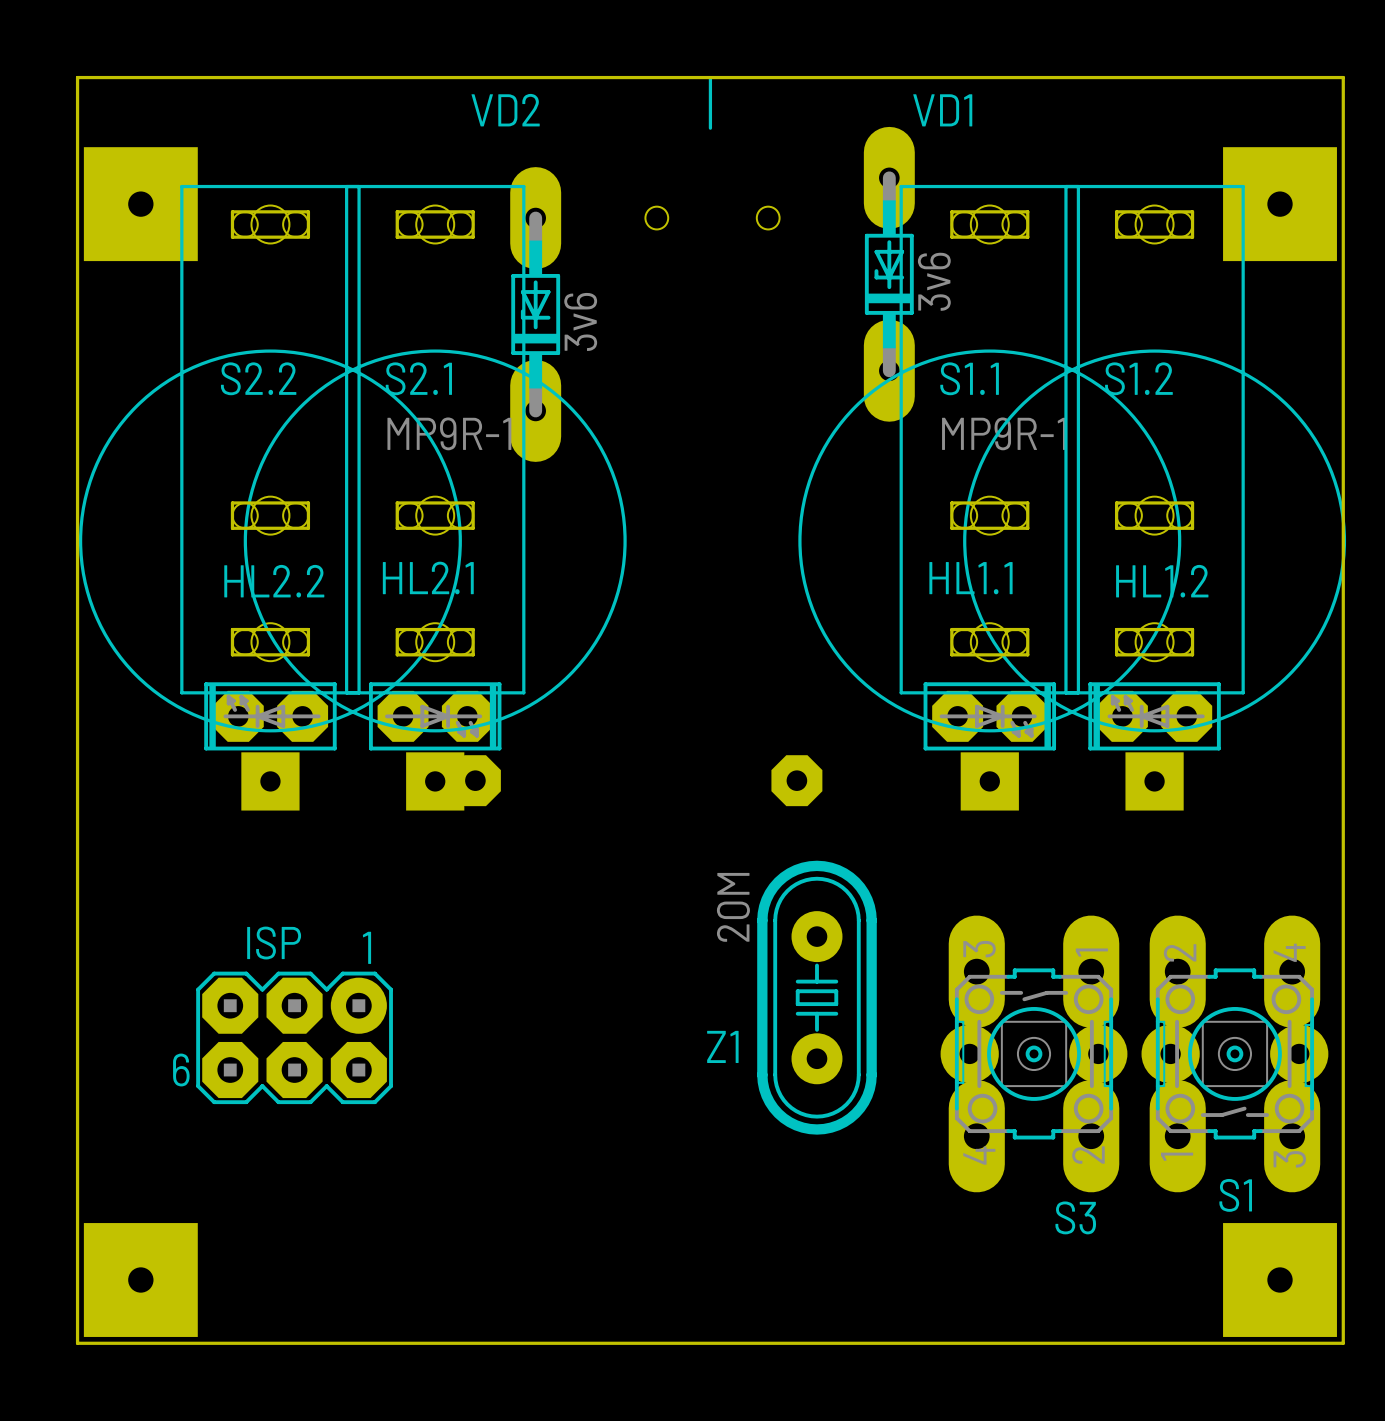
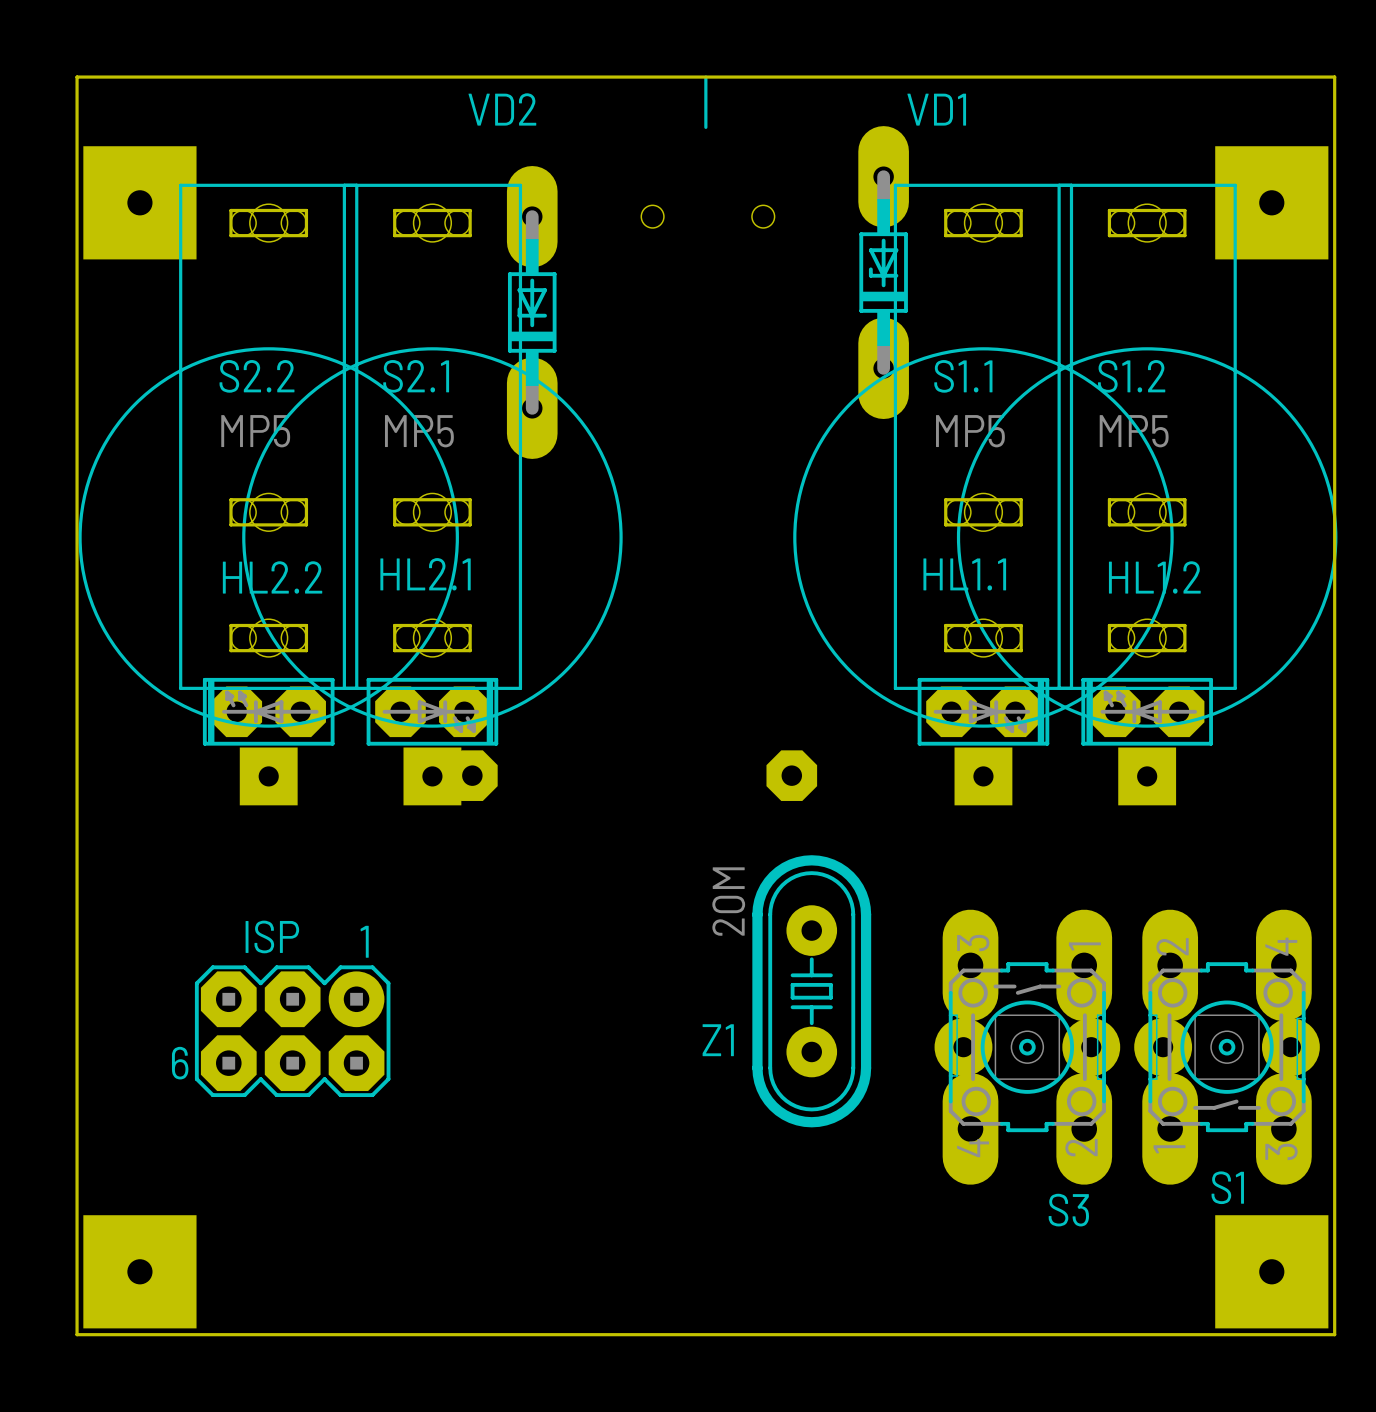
VD1 value: 3v6 (934, 281) -> none
VD2 value: 3v6 (580, 321) -> none
S2.2 value: none -> MP5 (255, 431)
S2.1 value: MP9R-1 (449, 433) -> MP5 (419, 431)
S1.1 value: MP9R-1 (1003, 433) -> MP5 (970, 431)
S1.2 value: none -> MP5 (1134, 431)

